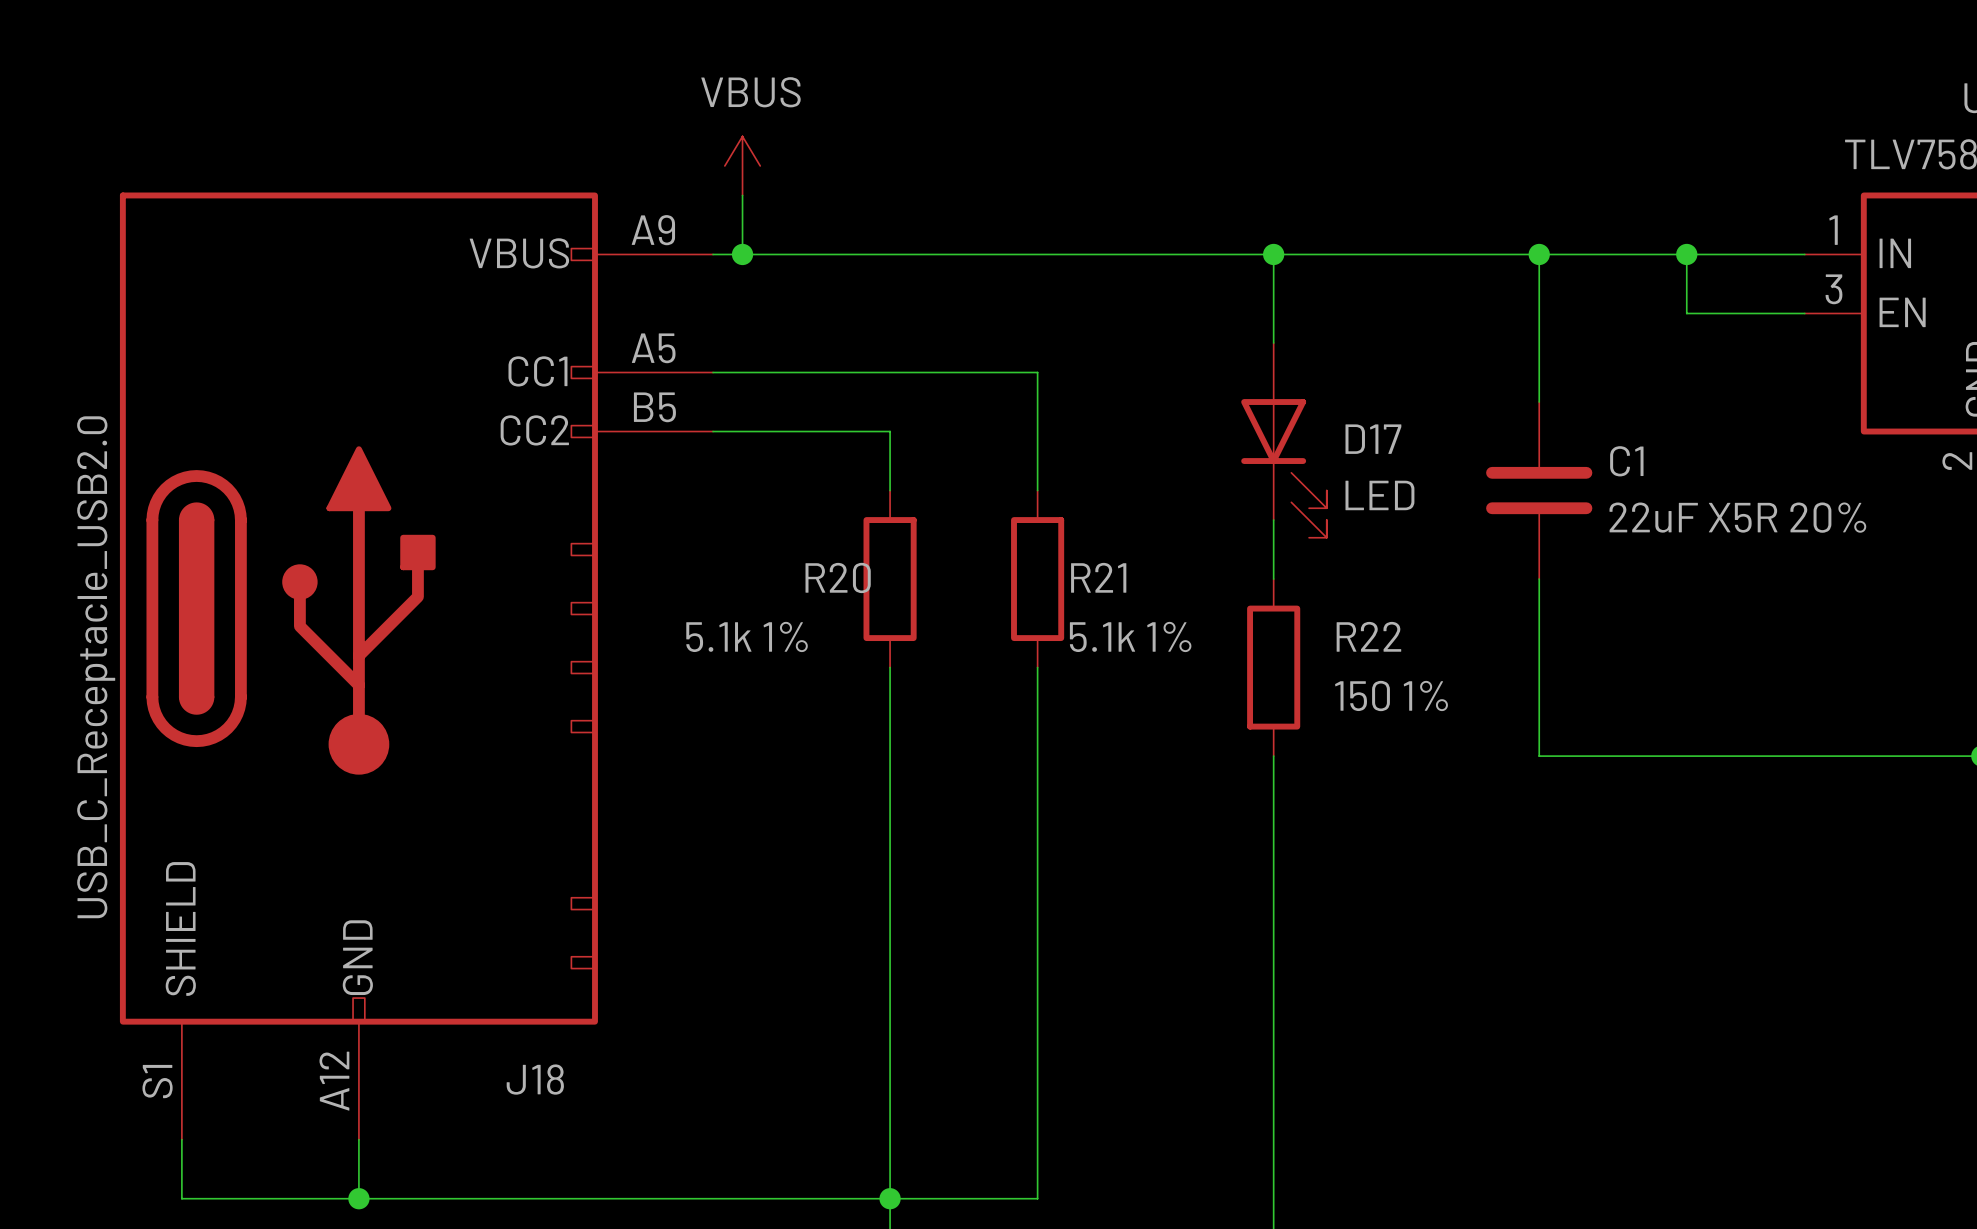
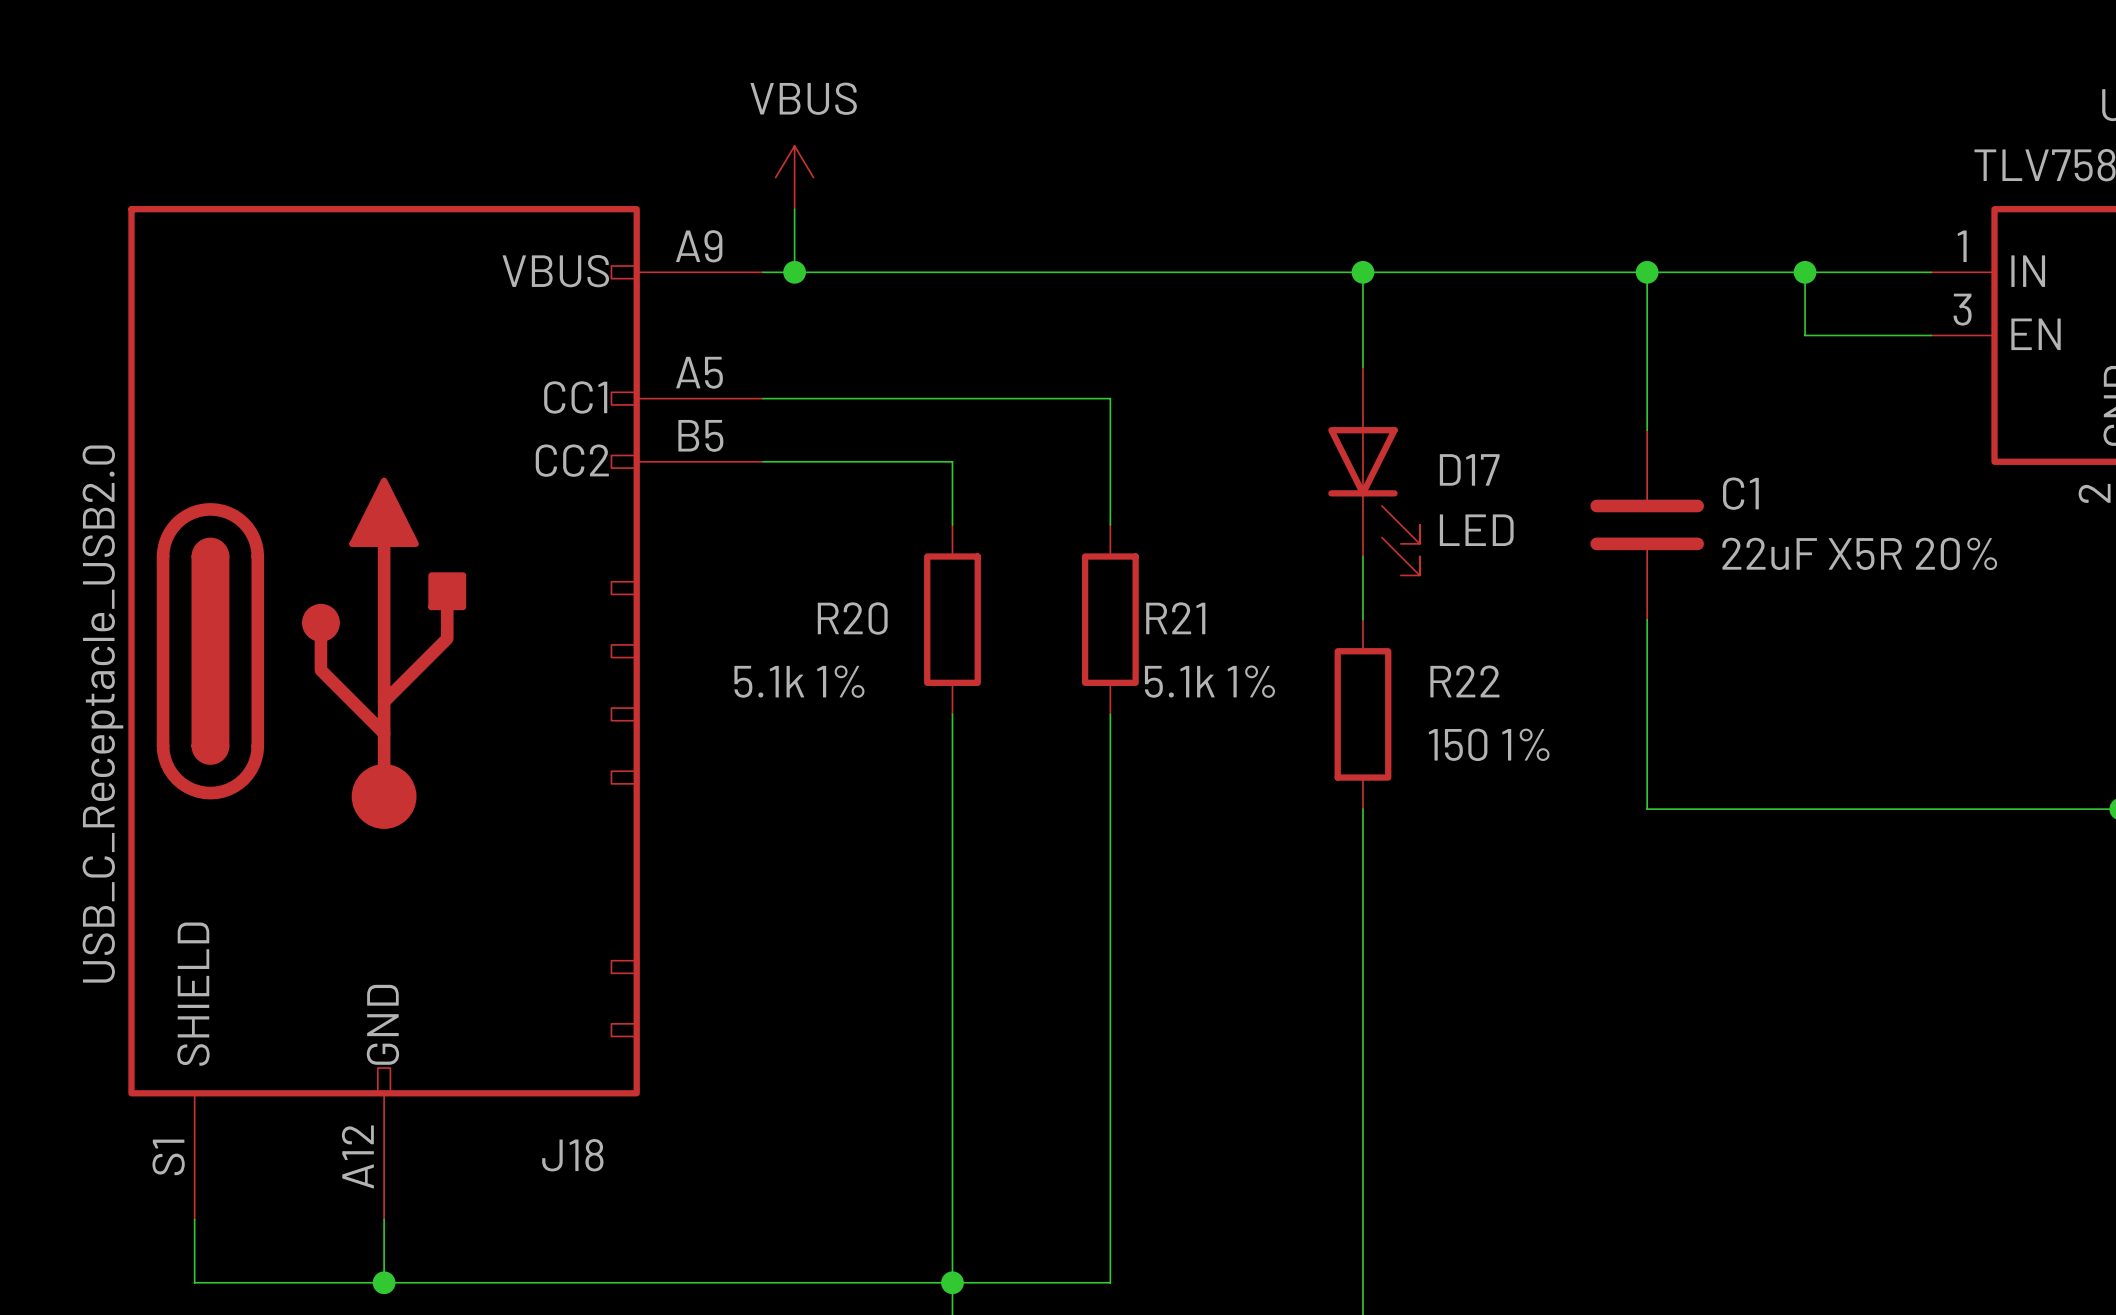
R20 name position: R20 (838, 577) -> R20 (852, 618)

